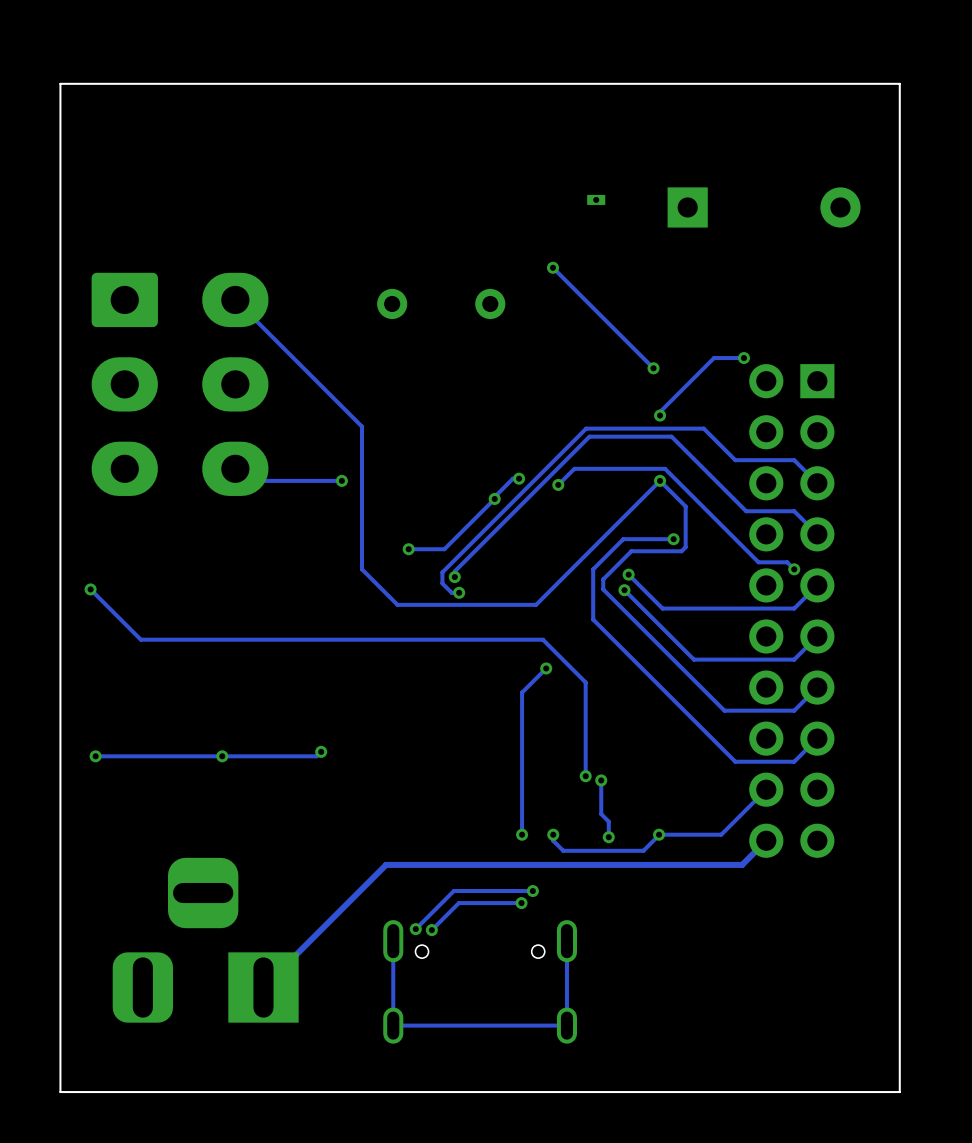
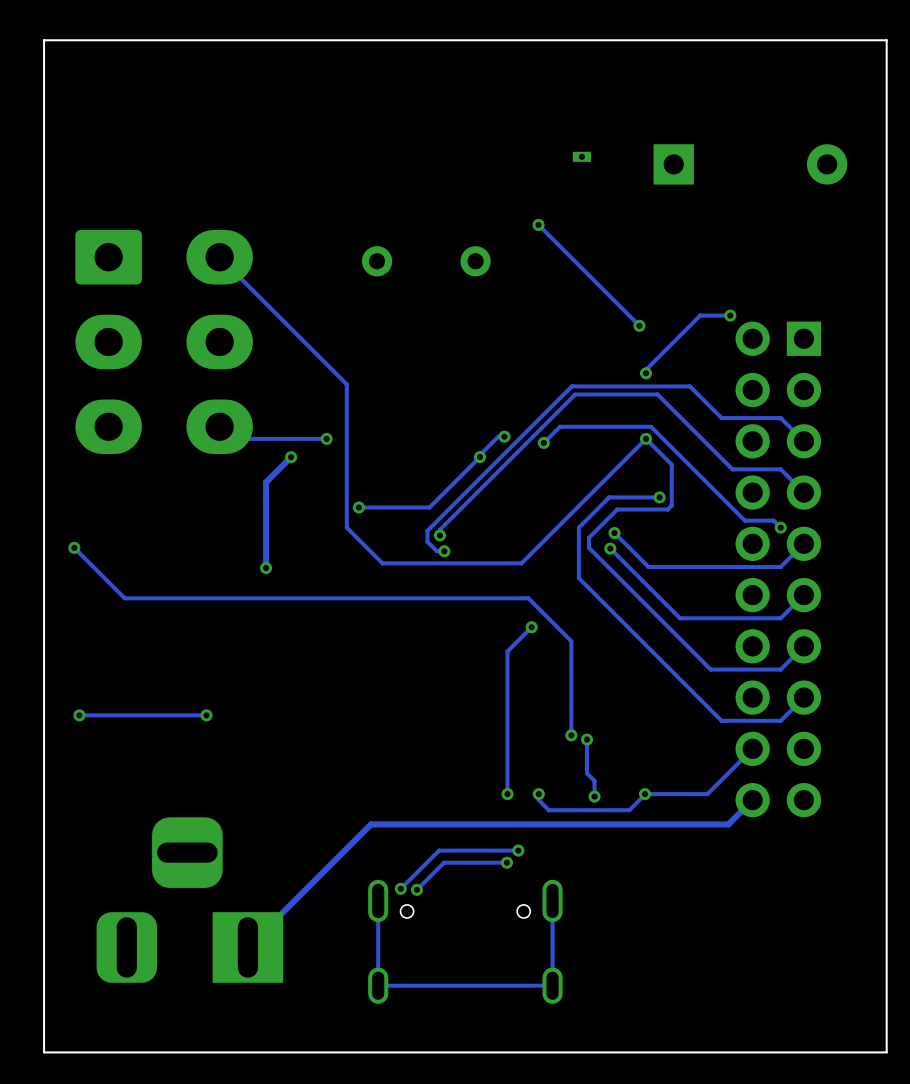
track: none -> (291, 457) (266, 482) (266, 568)
via: none -> (291, 457)
track: none -> (393, 507) (358, 507)
via position: (408, 549) -> (358, 507)
via: none -> (266, 568)
track: (321, 751) (316, 756) (222, 756) -> none
via: (321, 751) -> none

